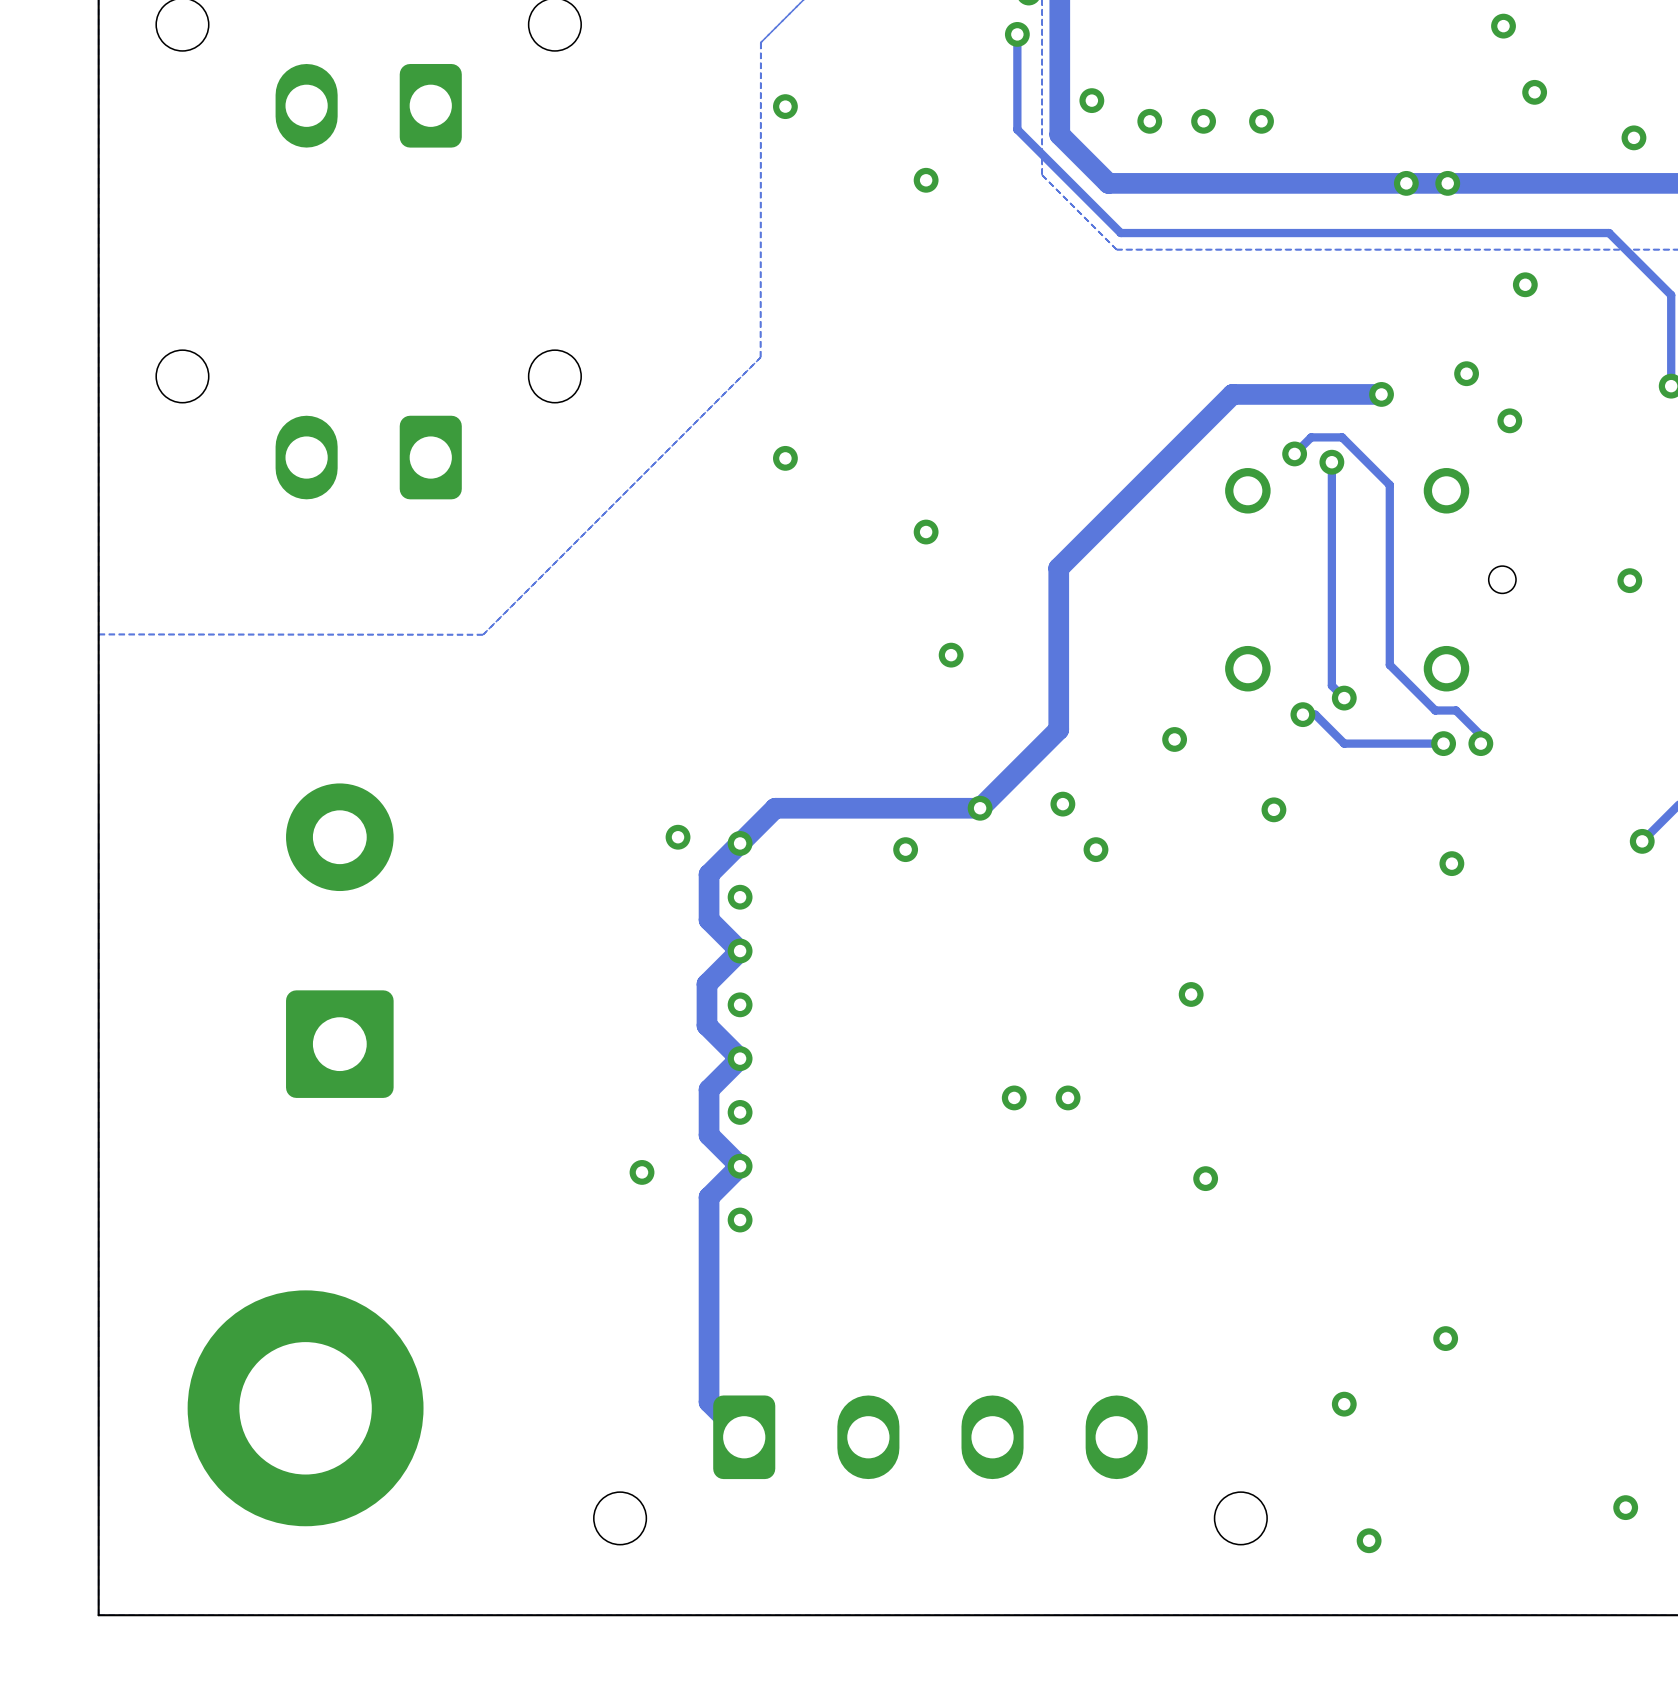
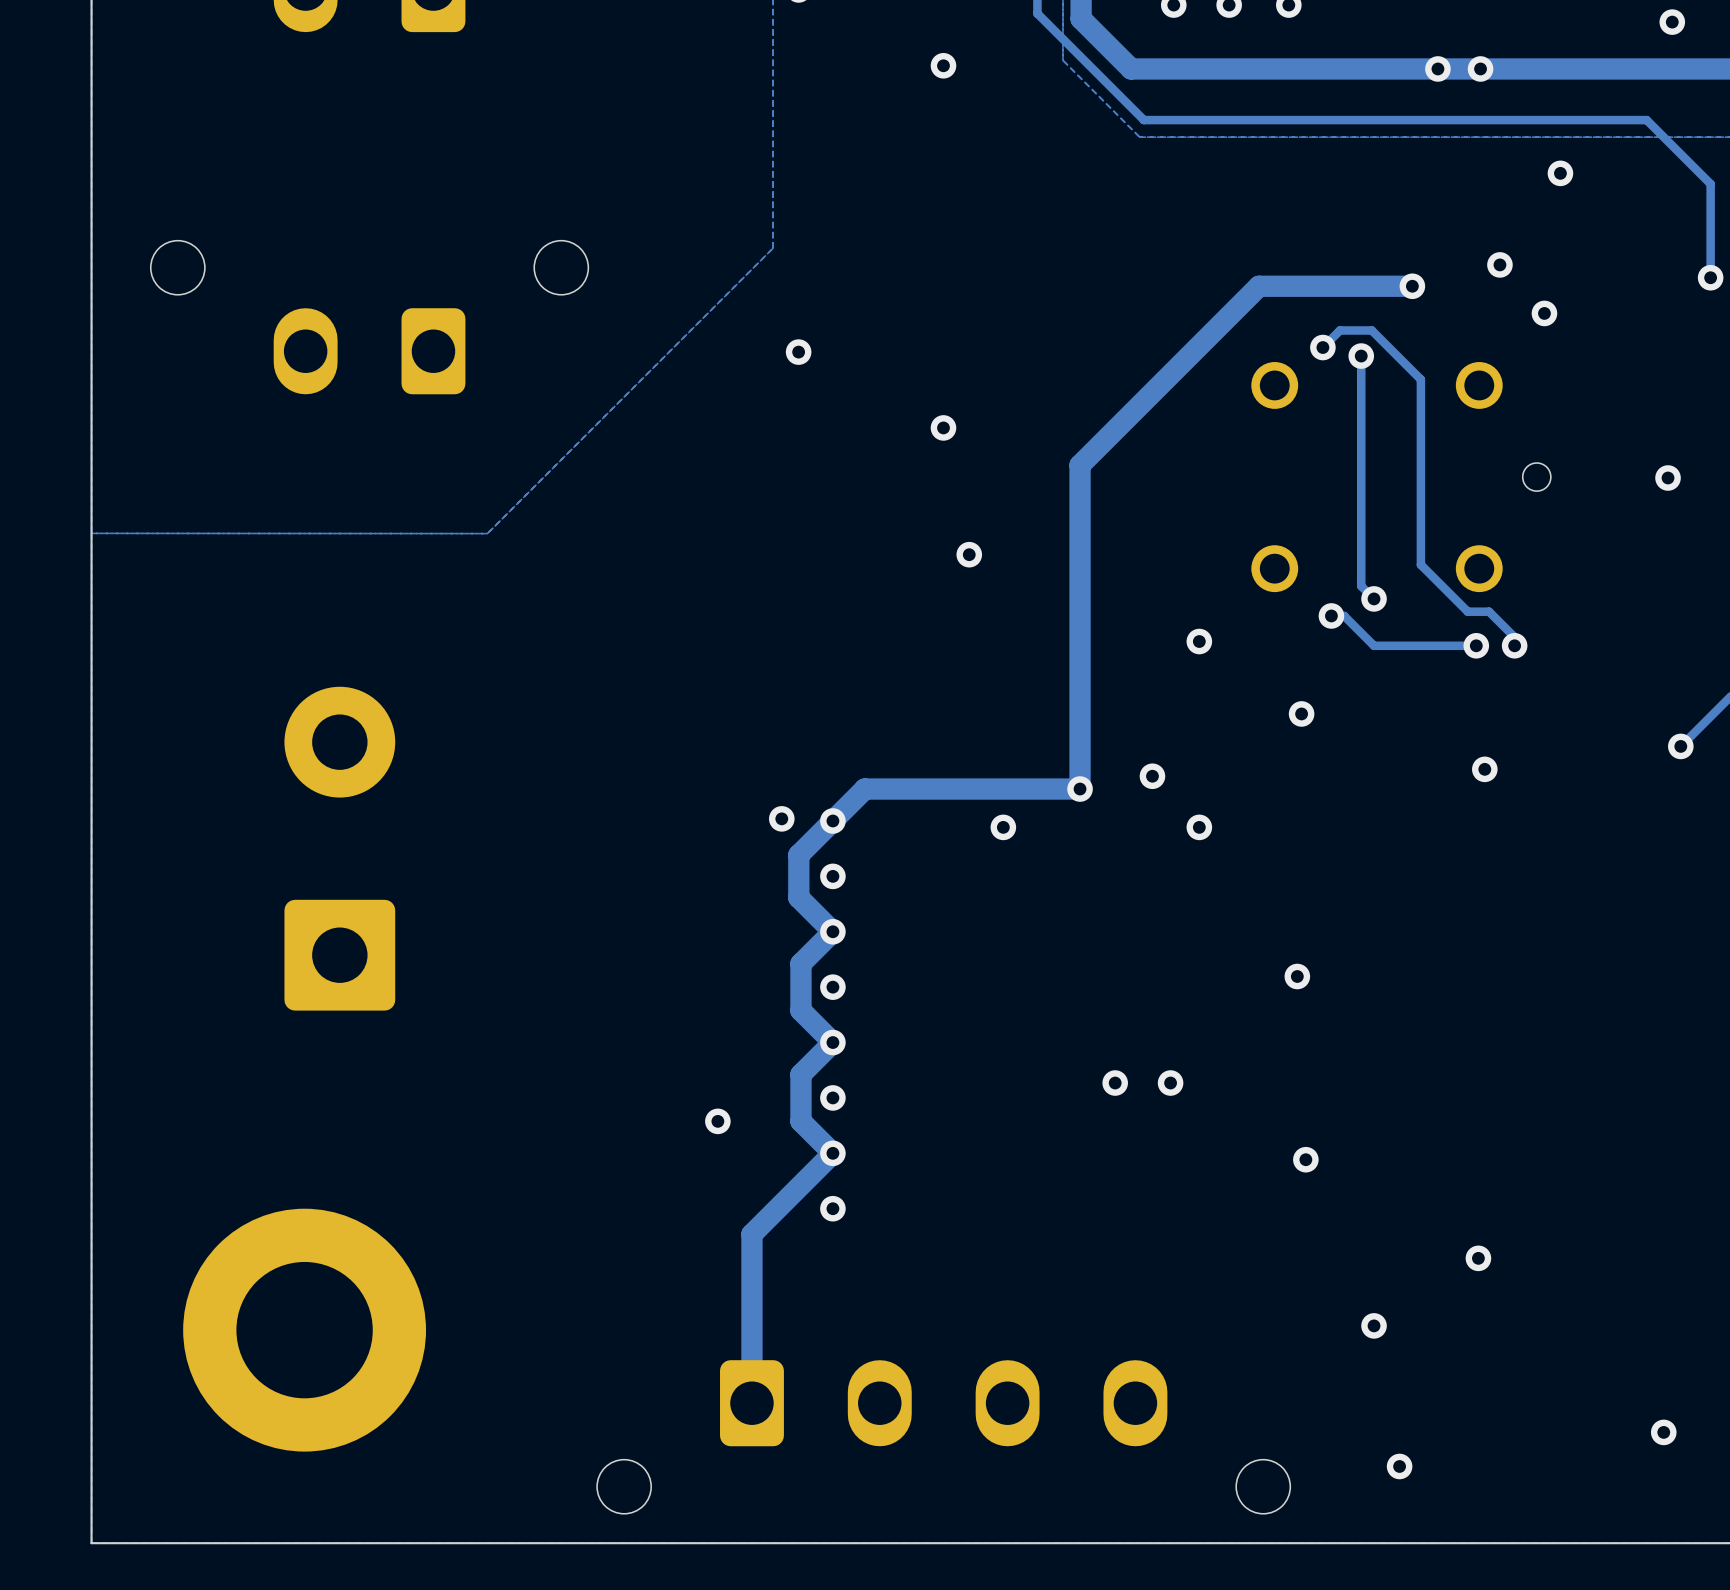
track: (1058, 729) (980, 808) (775, 808) (709, 874) (709, 919) (740, 951) (706, 984) (706, 1025) (740, 1058) (709, 1089) (709, 1135) (740, 1166) (709, 1197) (709, 1402) (744, 1437) -> (1080, 631) (1080, 789) (864, 789) (798, 855) (798, 897) (832, 931) (800, 963) (800, 1010) (832, 1042) (800, 1074) (800, 1121) (832, 1153) (751, 1234) (751, 1403)
via: (1062, 804) -> none
via: (980, 808) -> none
via: (678, 837) -> none
via: (740, 843) -> none
via: (905, 849) -> none
via: (1095, 849) -> none
via: none -> (1152, 776)
via: none -> (1080, 789)
via: (740, 897) -> none
via: none -> (781, 818)
via: none -> (832, 820)
via: none -> (1003, 827)
via: none -> (1199, 827)
via: (740, 951) -> none
via: none -> (832, 876)
via: (1191, 994) -> none
via: (740, 1004) -> none
via: none -> (832, 931)
via: (740, 1058) -> none
via: none -> (1297, 976)
via: none -> (832, 987)
via: (1014, 1097) -> none
via: (1068, 1097) -> none
via: (740, 1112) -> none
via: none -> (832, 1042)
via: (740, 1166) -> none
via: none -> (1115, 1083)
via: none -> (1170, 1083)
via: (642, 1172) -> none
via: (1205, 1178) -> none
via: none -> (832, 1097)
via: none -> (717, 1121)
via: (740, 1220) -> none
via: none -> (832, 1153)
via: none -> (1305, 1159)
via: none -> (832, 1208)
part position: (930, 1470) -> (943, 1436)

